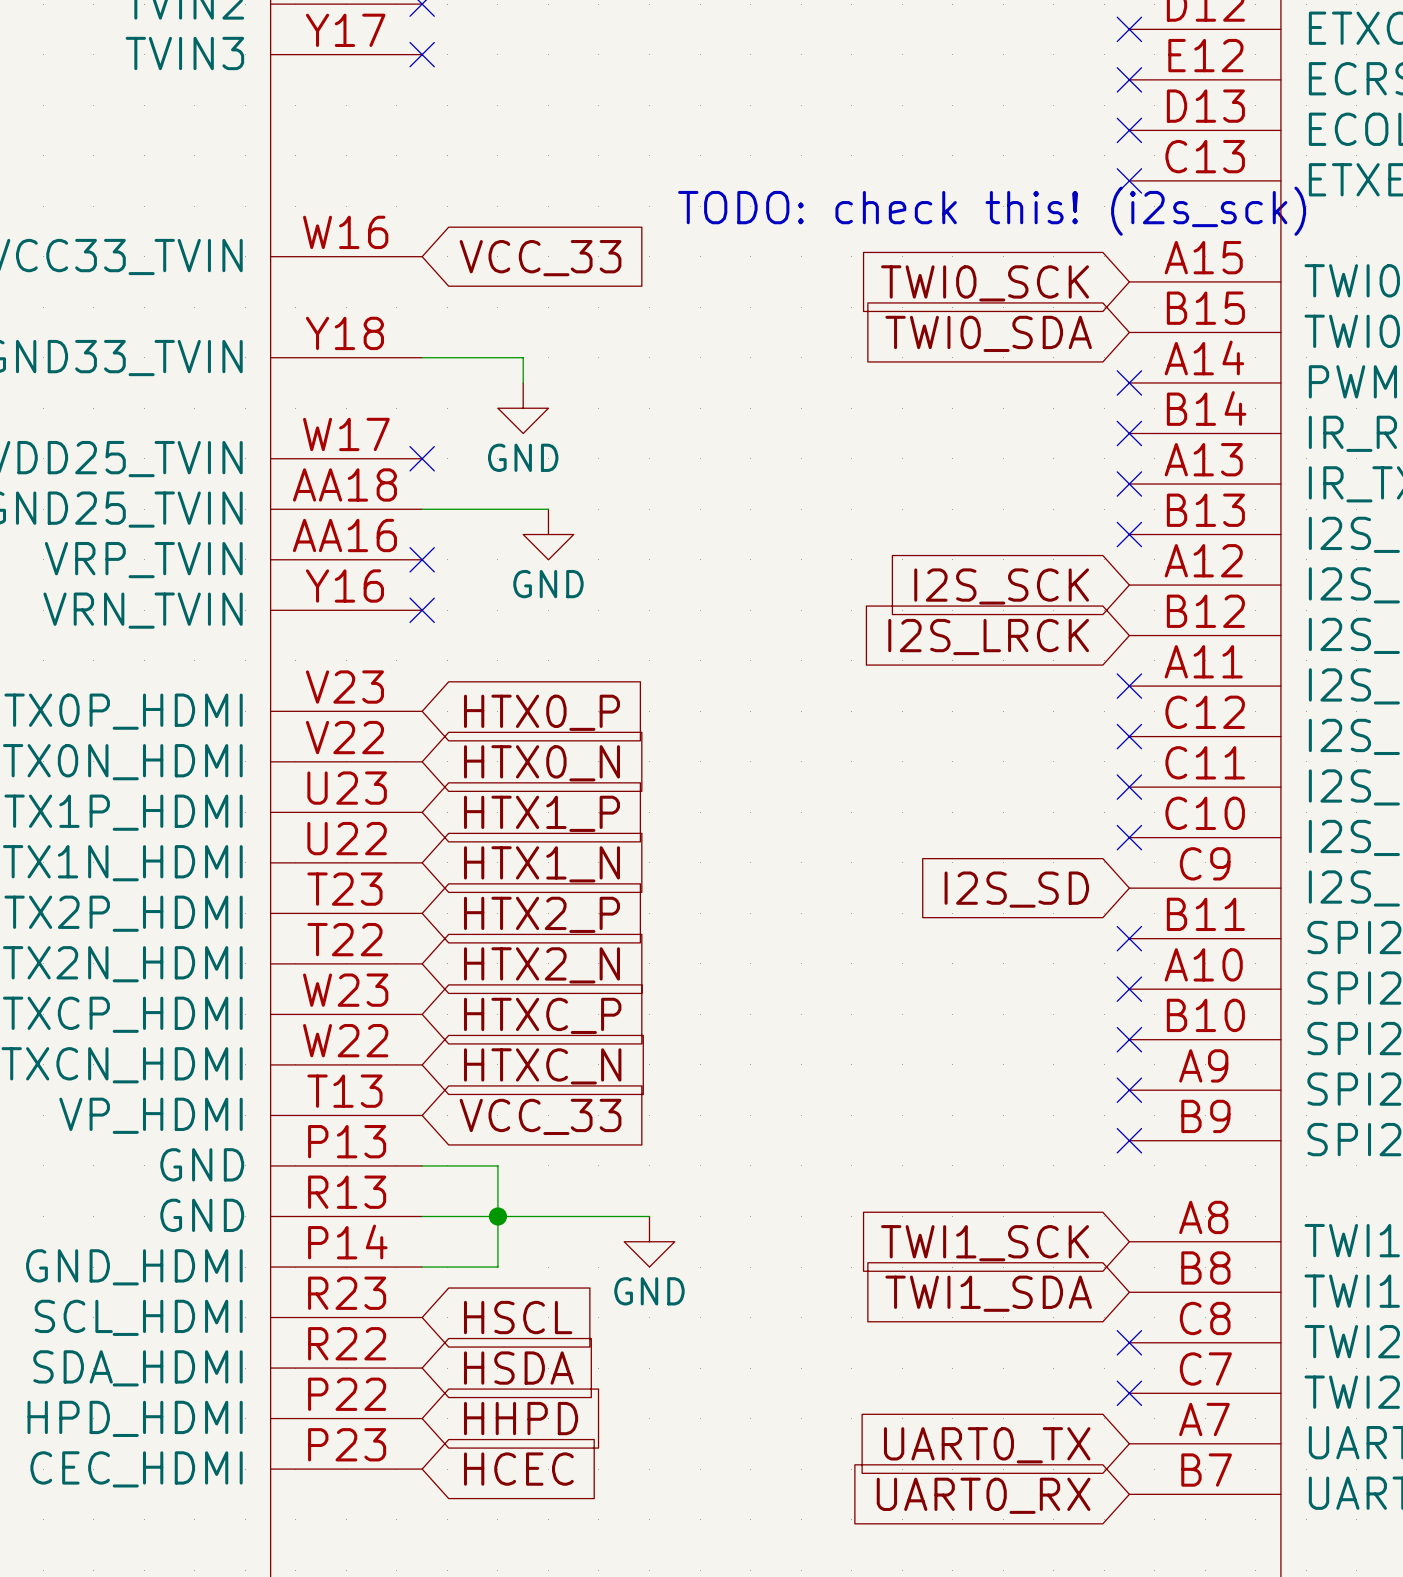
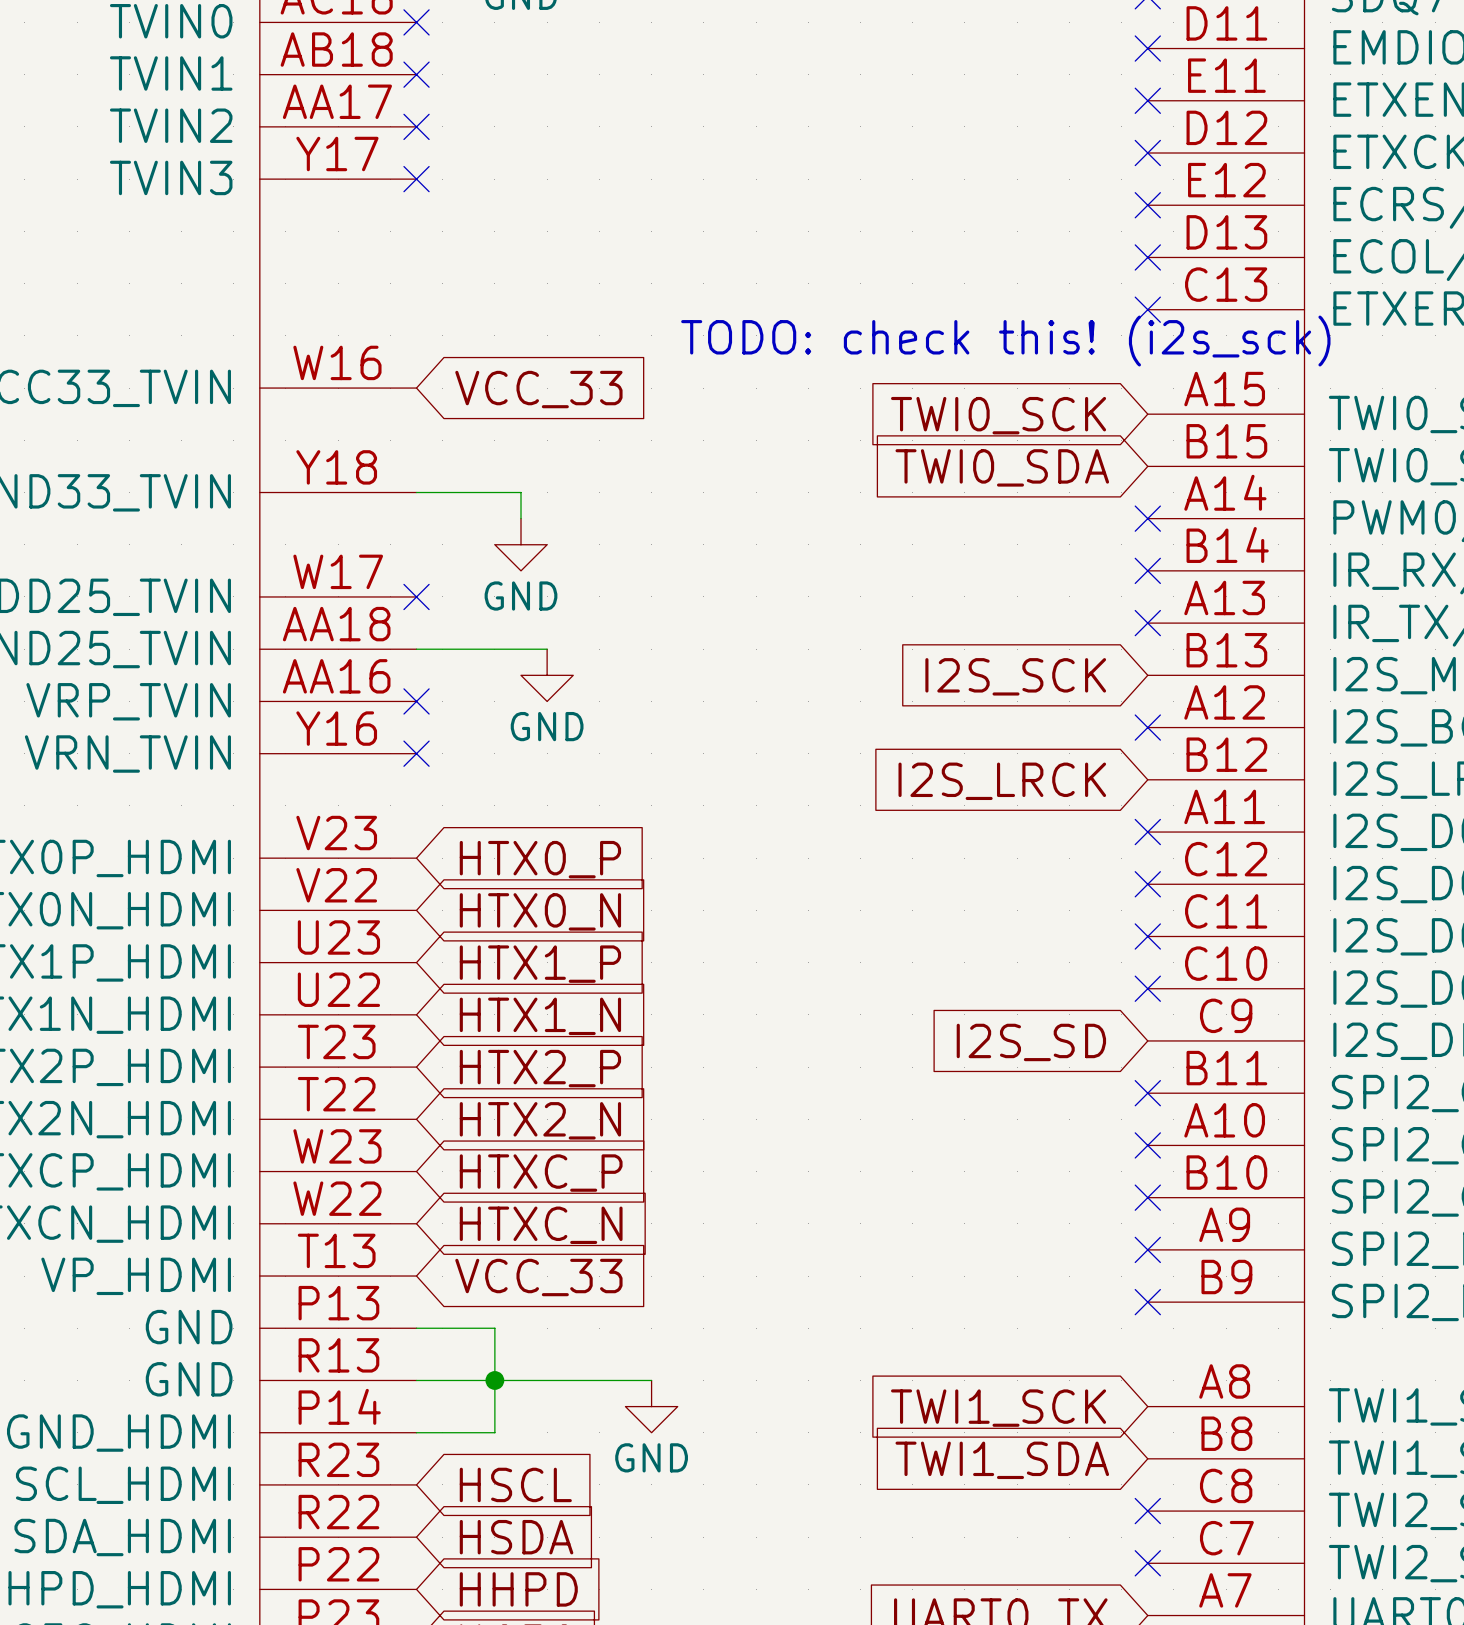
no-connect mark position: (1129, 534) -> (1147, 727)
global label position: I2S_SCK (1001, 586) -> I2S_SCK (1015, 676)

